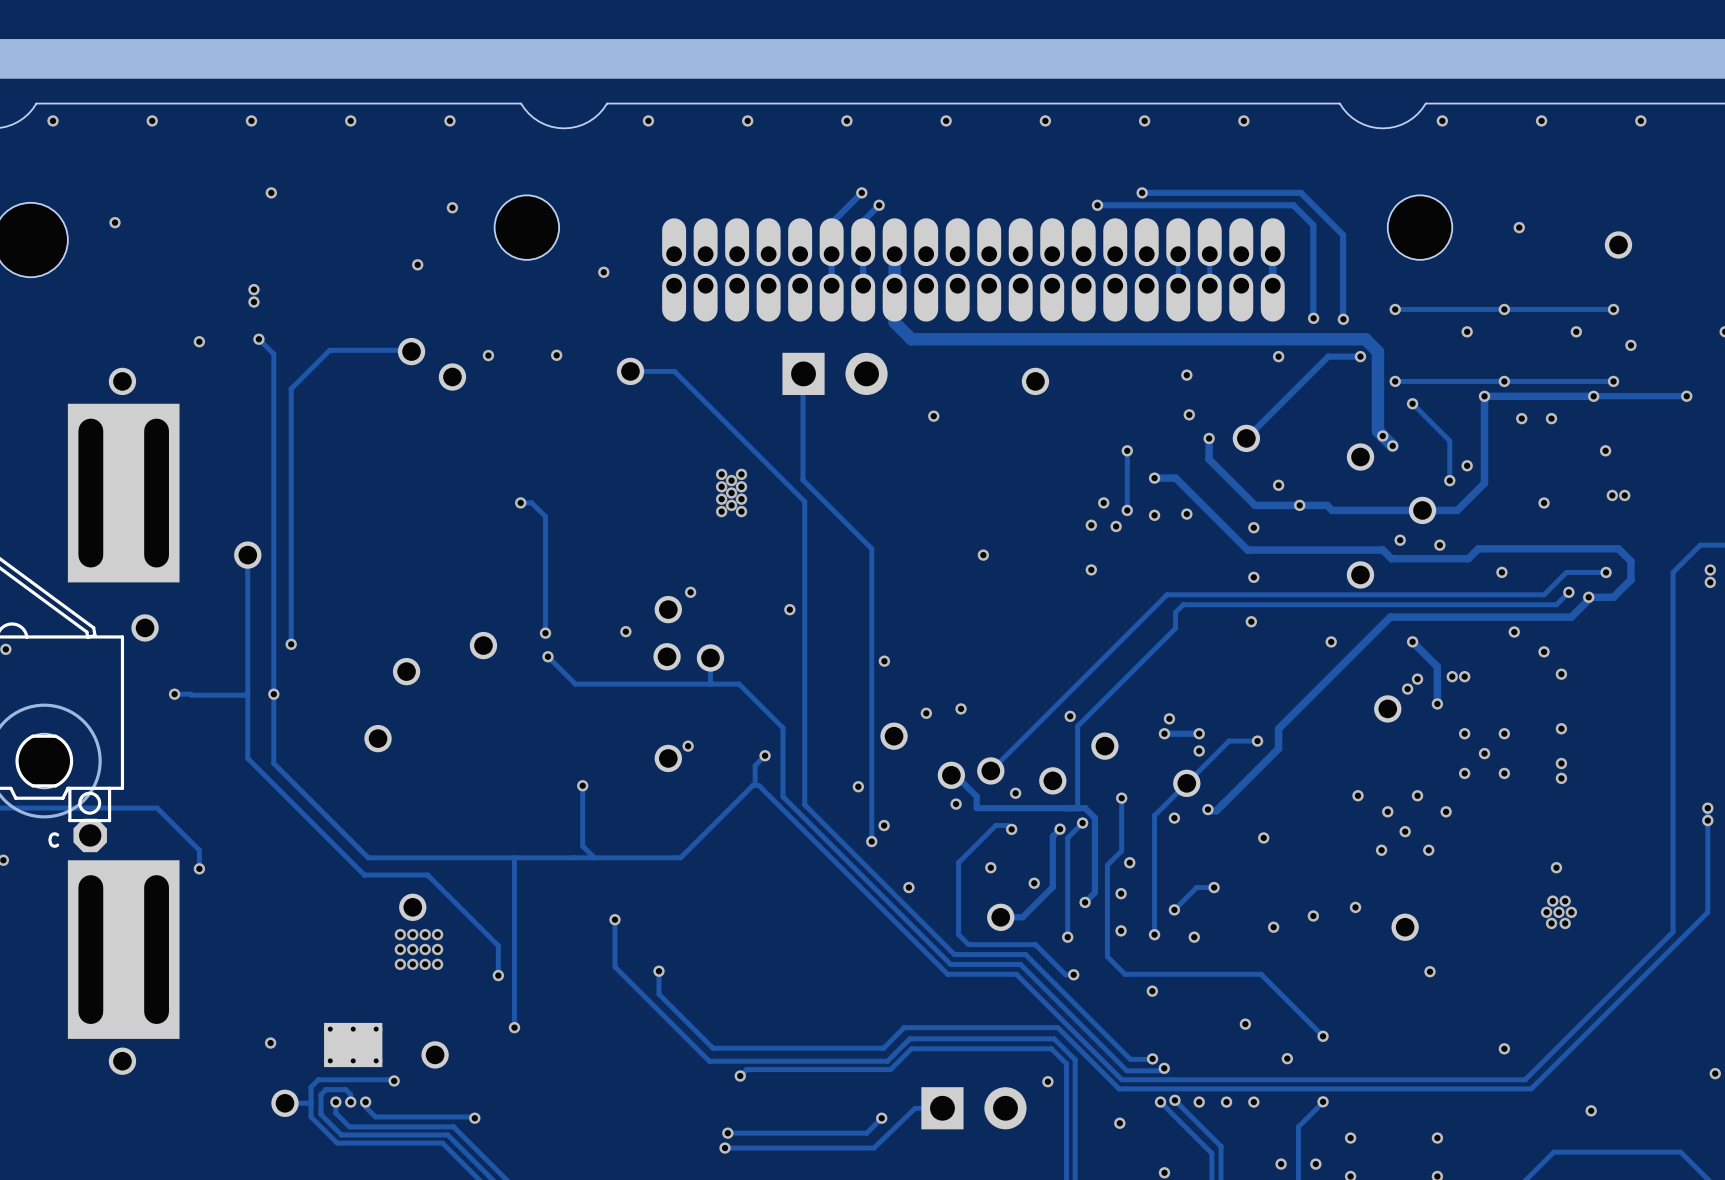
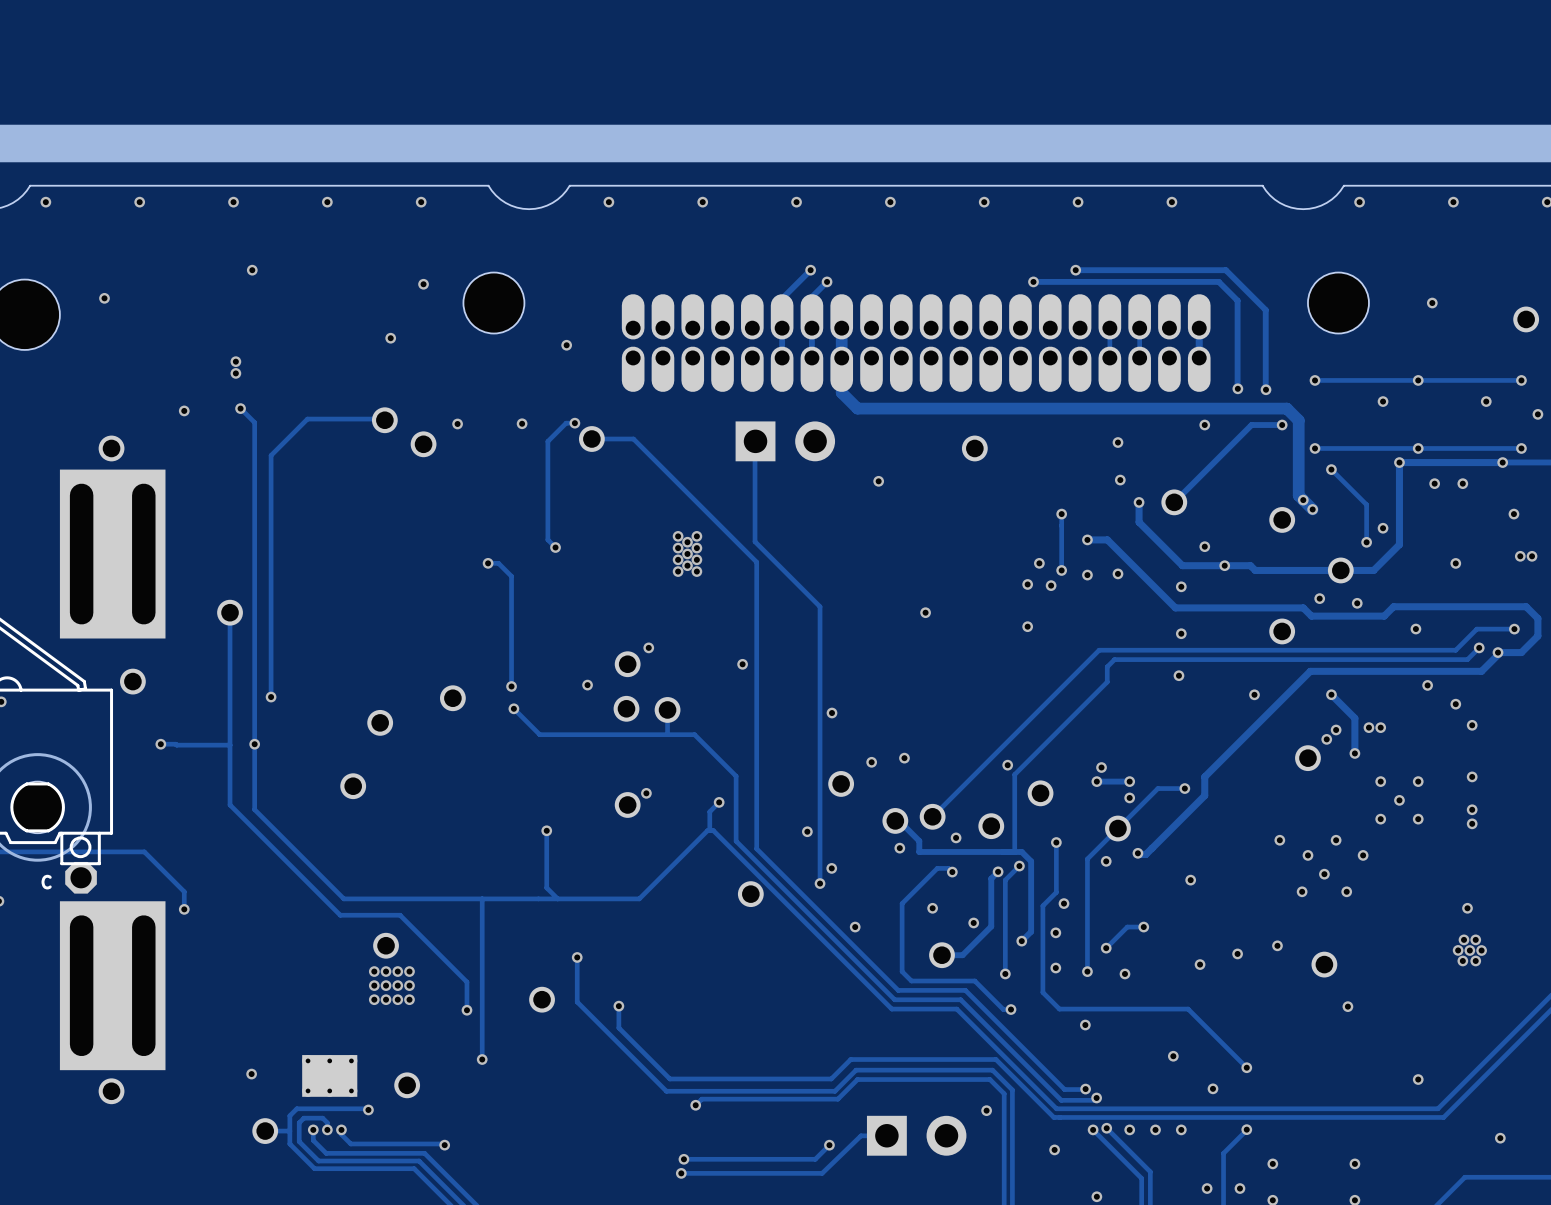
track: none -> (574, 423) (566, 423) (547, 441) (547, 539) (555, 547)
via: none -> (574, 423)
via: none -> (555, 547)
part: none -> (750, 894)
part: none -> (542, 999)

